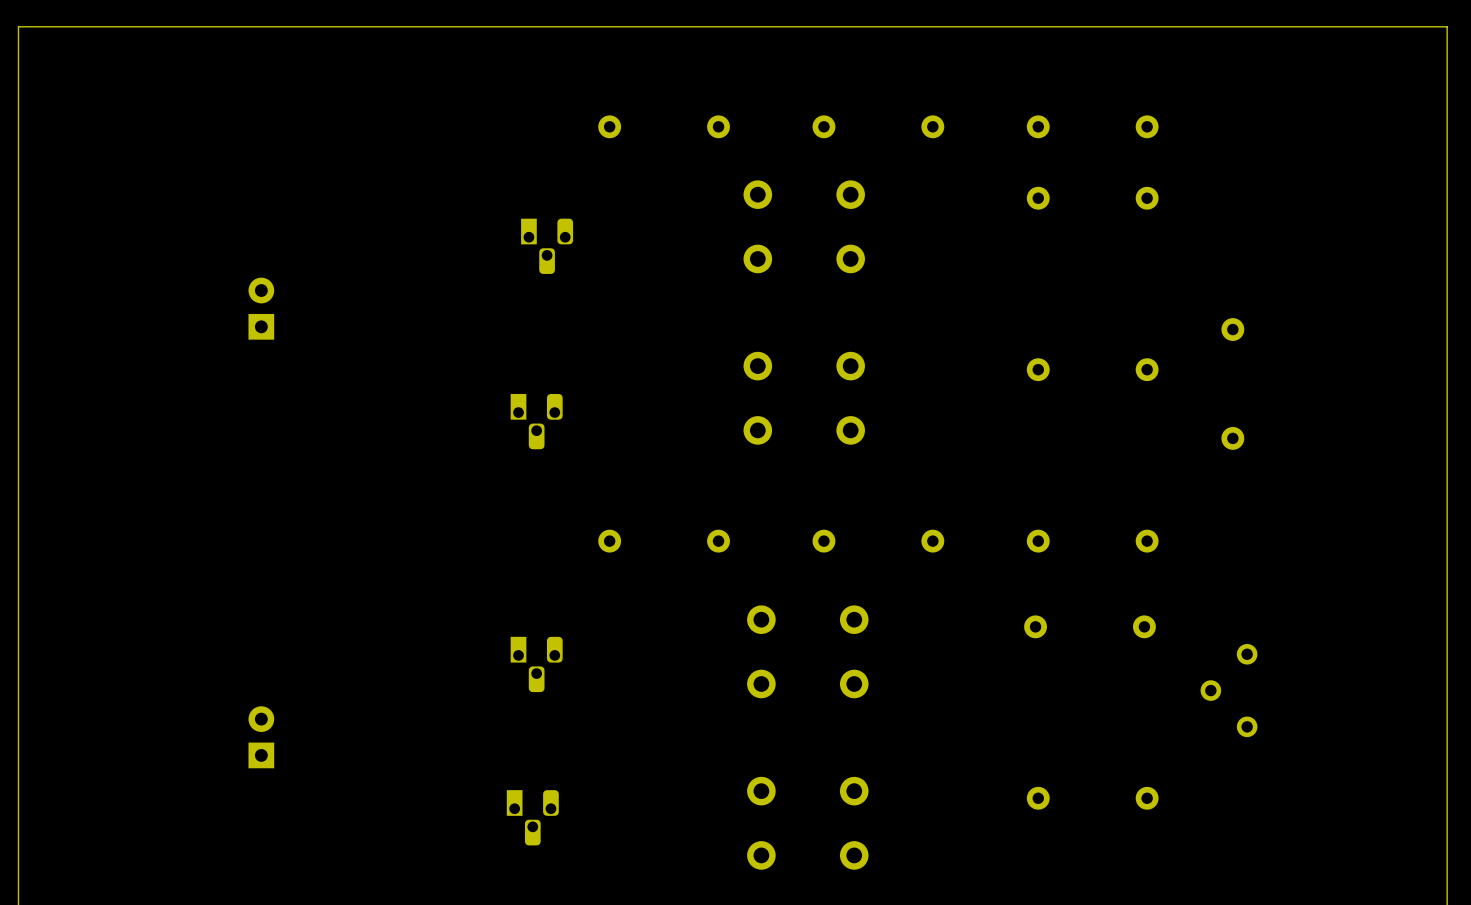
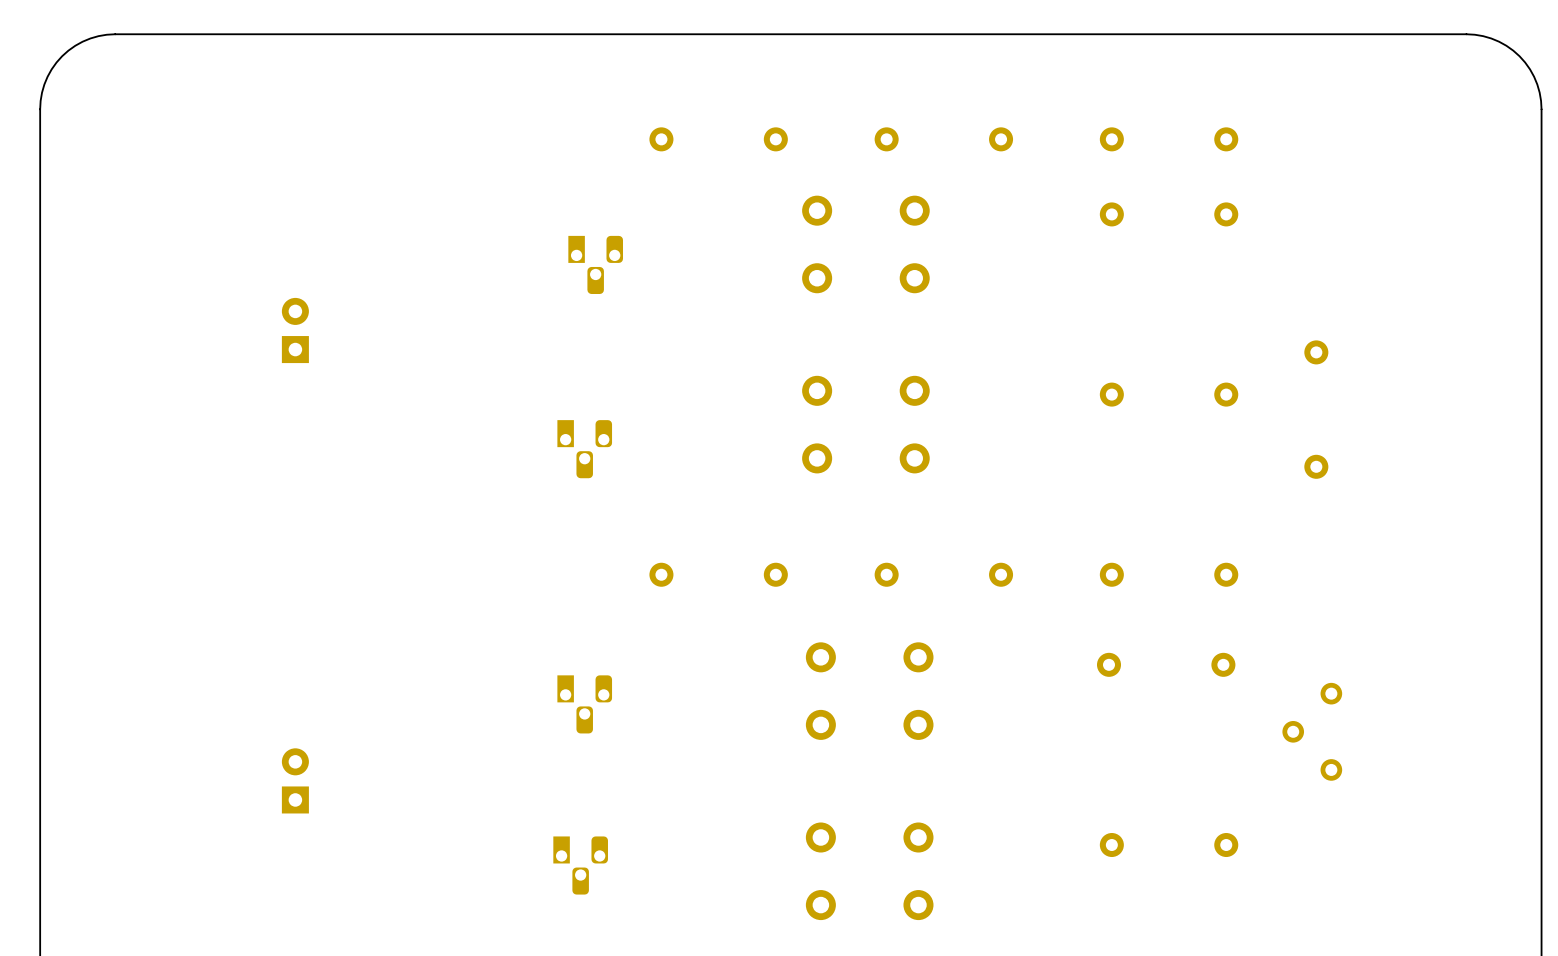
board edge: (89, 26) (18, 26) (18, 98) -> (115, 34) (98, 36) (82, 41) (62, 56) (51, 69) (44, 84) (40, 109)
board edge: (1375, 26) (1447, 26) (1447, 98) -> (1466, 34) (1491, 38) (1506, 45) (1519, 56) (1534, 76) (1539, 92) (1541, 109)

